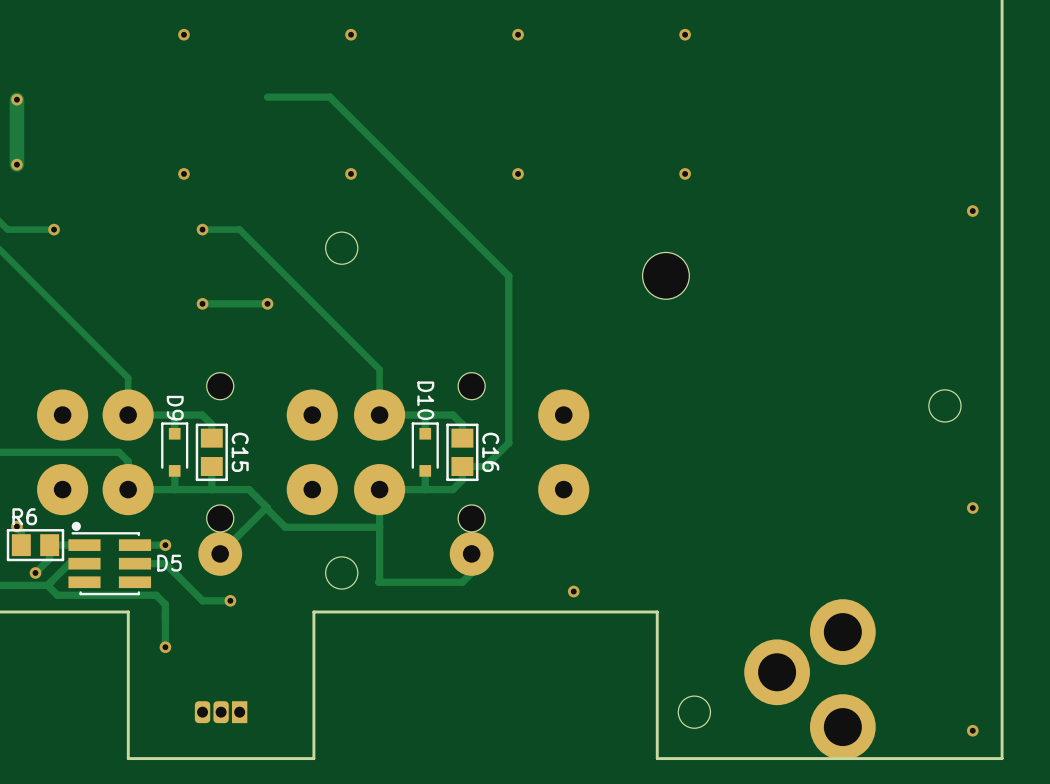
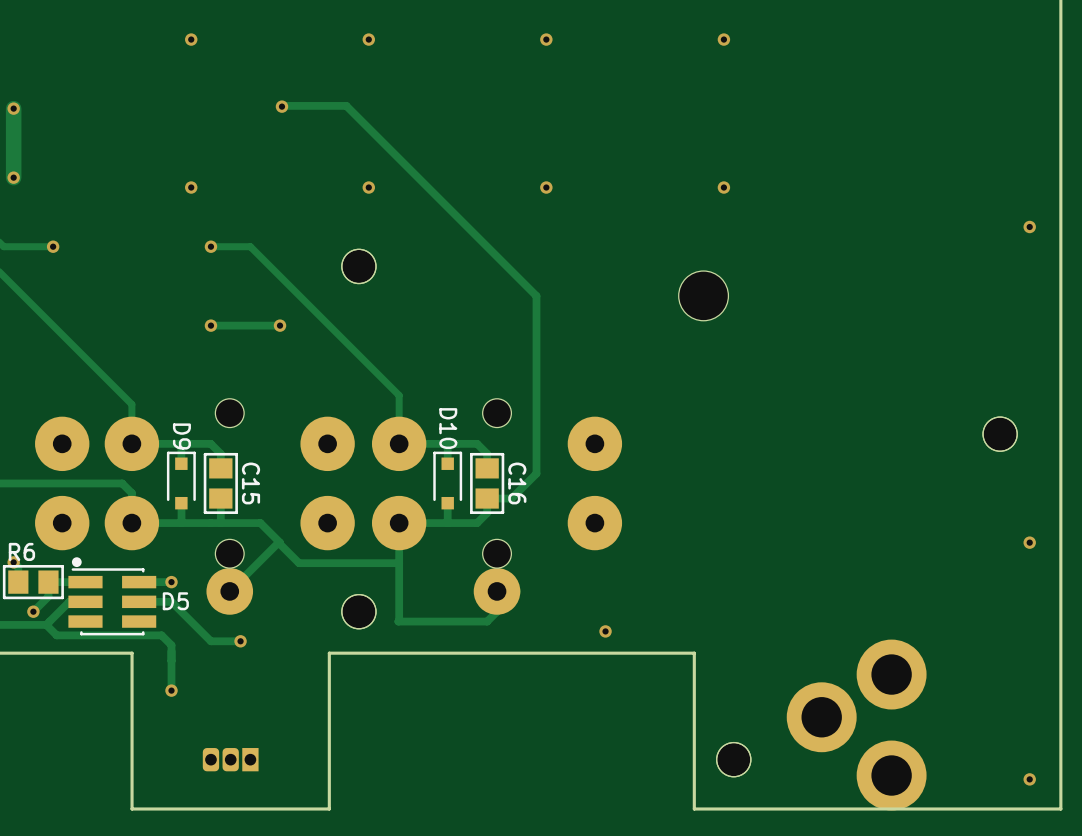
via: none -> (281, 106)
part: none -> (358, 266)
part: none -> (1000, 434)
part: none -> (358, 611)
part: none -> (733, 759)

